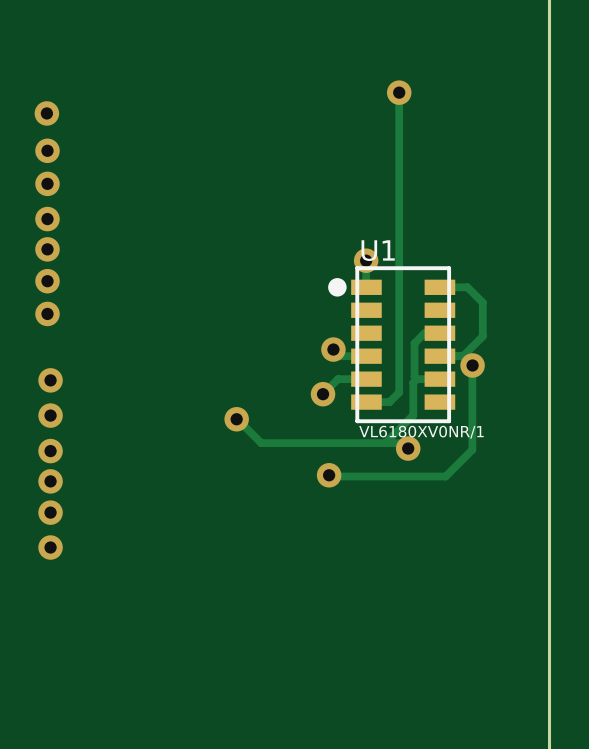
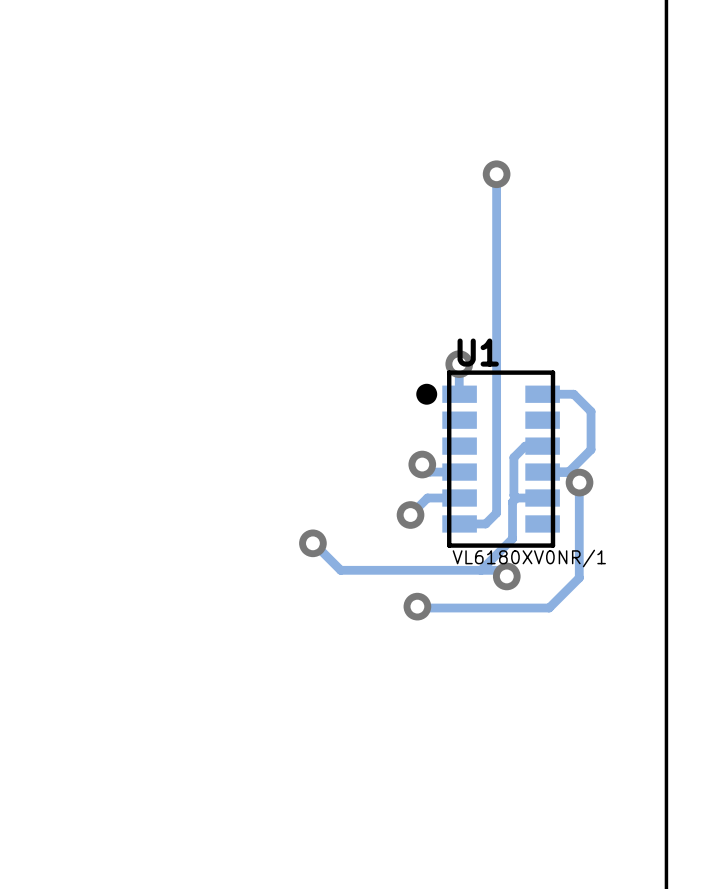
via: (46, 113) -> none
via: (47, 150) -> none
via: (47, 183) -> none
via: (47, 219) -> none
via: (47, 249) -> none
via: (47, 281) -> none
via: (47, 313) -> none
via: (50, 380) -> none
via: (50, 415) -> none
via: (50, 451) -> none
via: (50, 481) -> none
via: (50, 512) -> none
via: (50, 547) -> none

